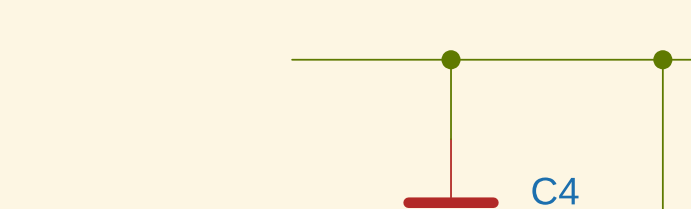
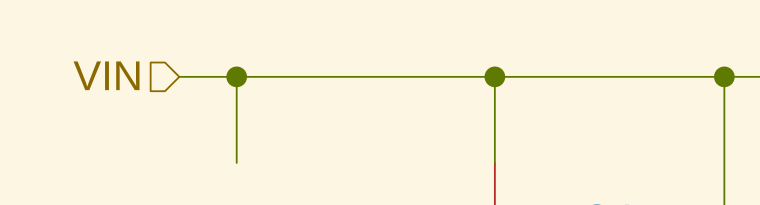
hierarchical label: none -> VIN (106, 75)
wire: none -> (179, 76) (322, 76)
wire: none -> (236, 76) (236, 162)
junction: none -> (236, 76)

